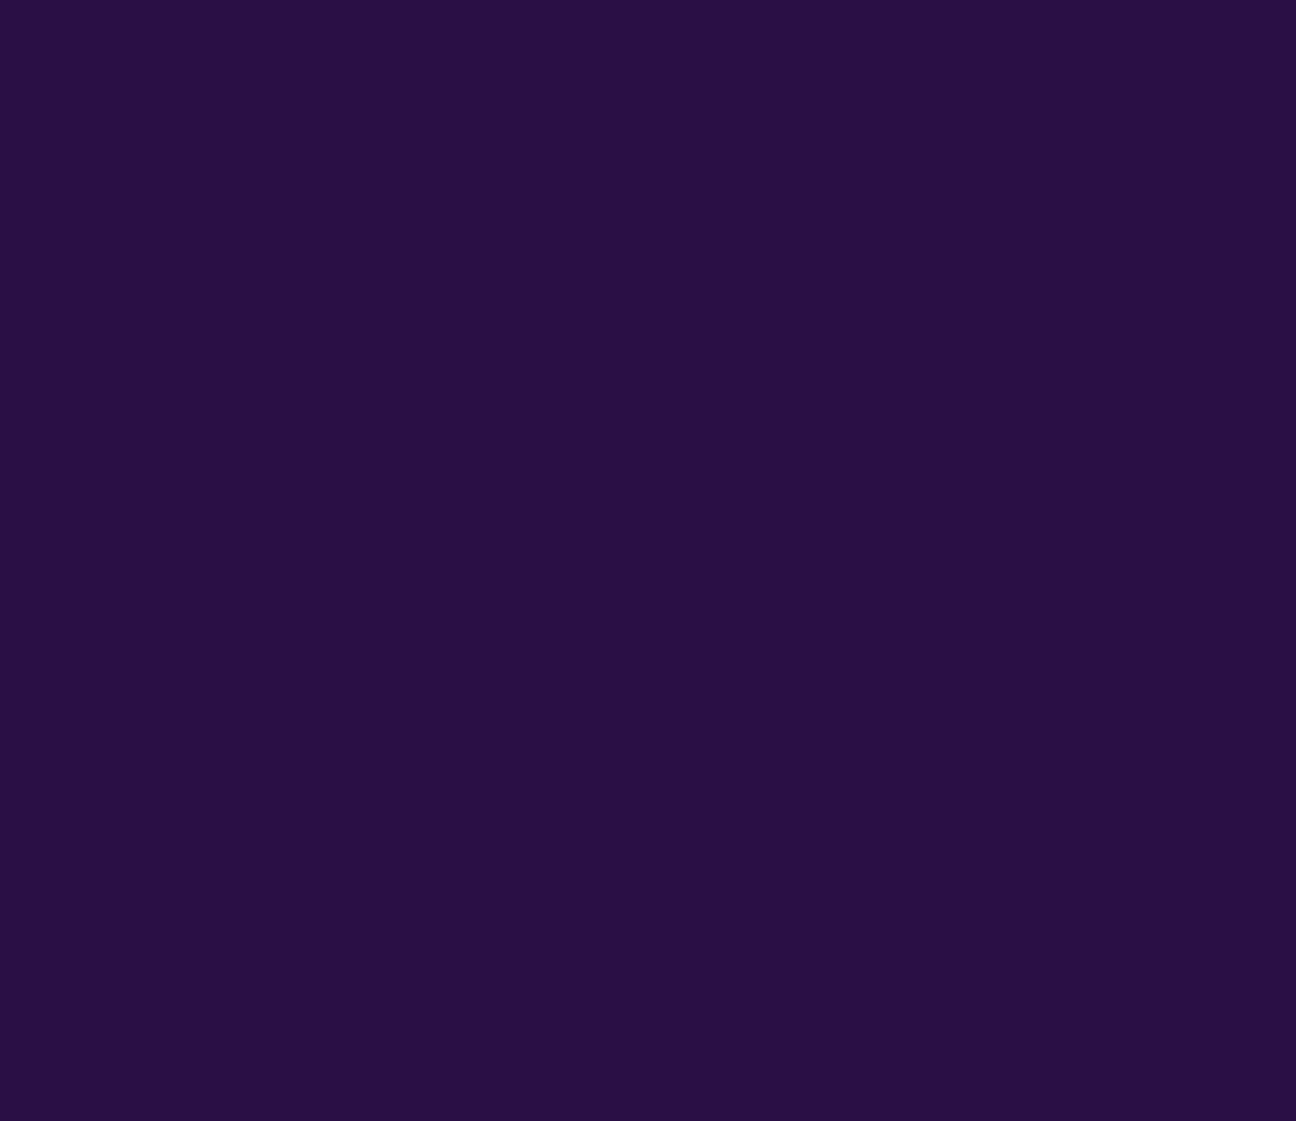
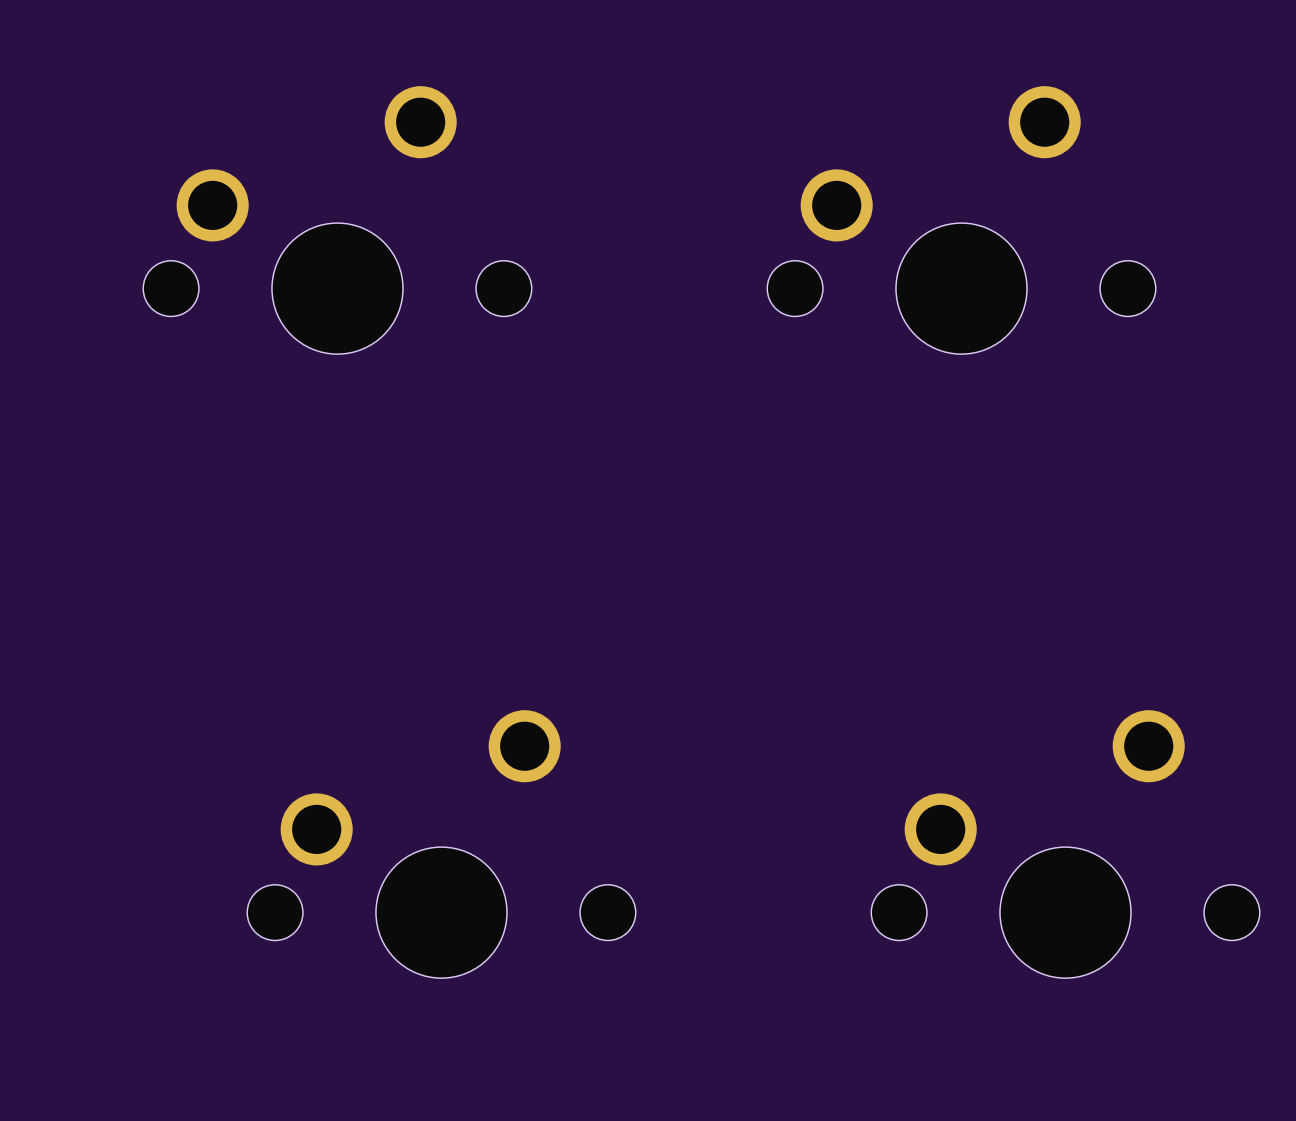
part: none -> (337, 220)
part: none -> (961, 220)
part: none -> (441, 844)
part: none -> (1065, 844)

